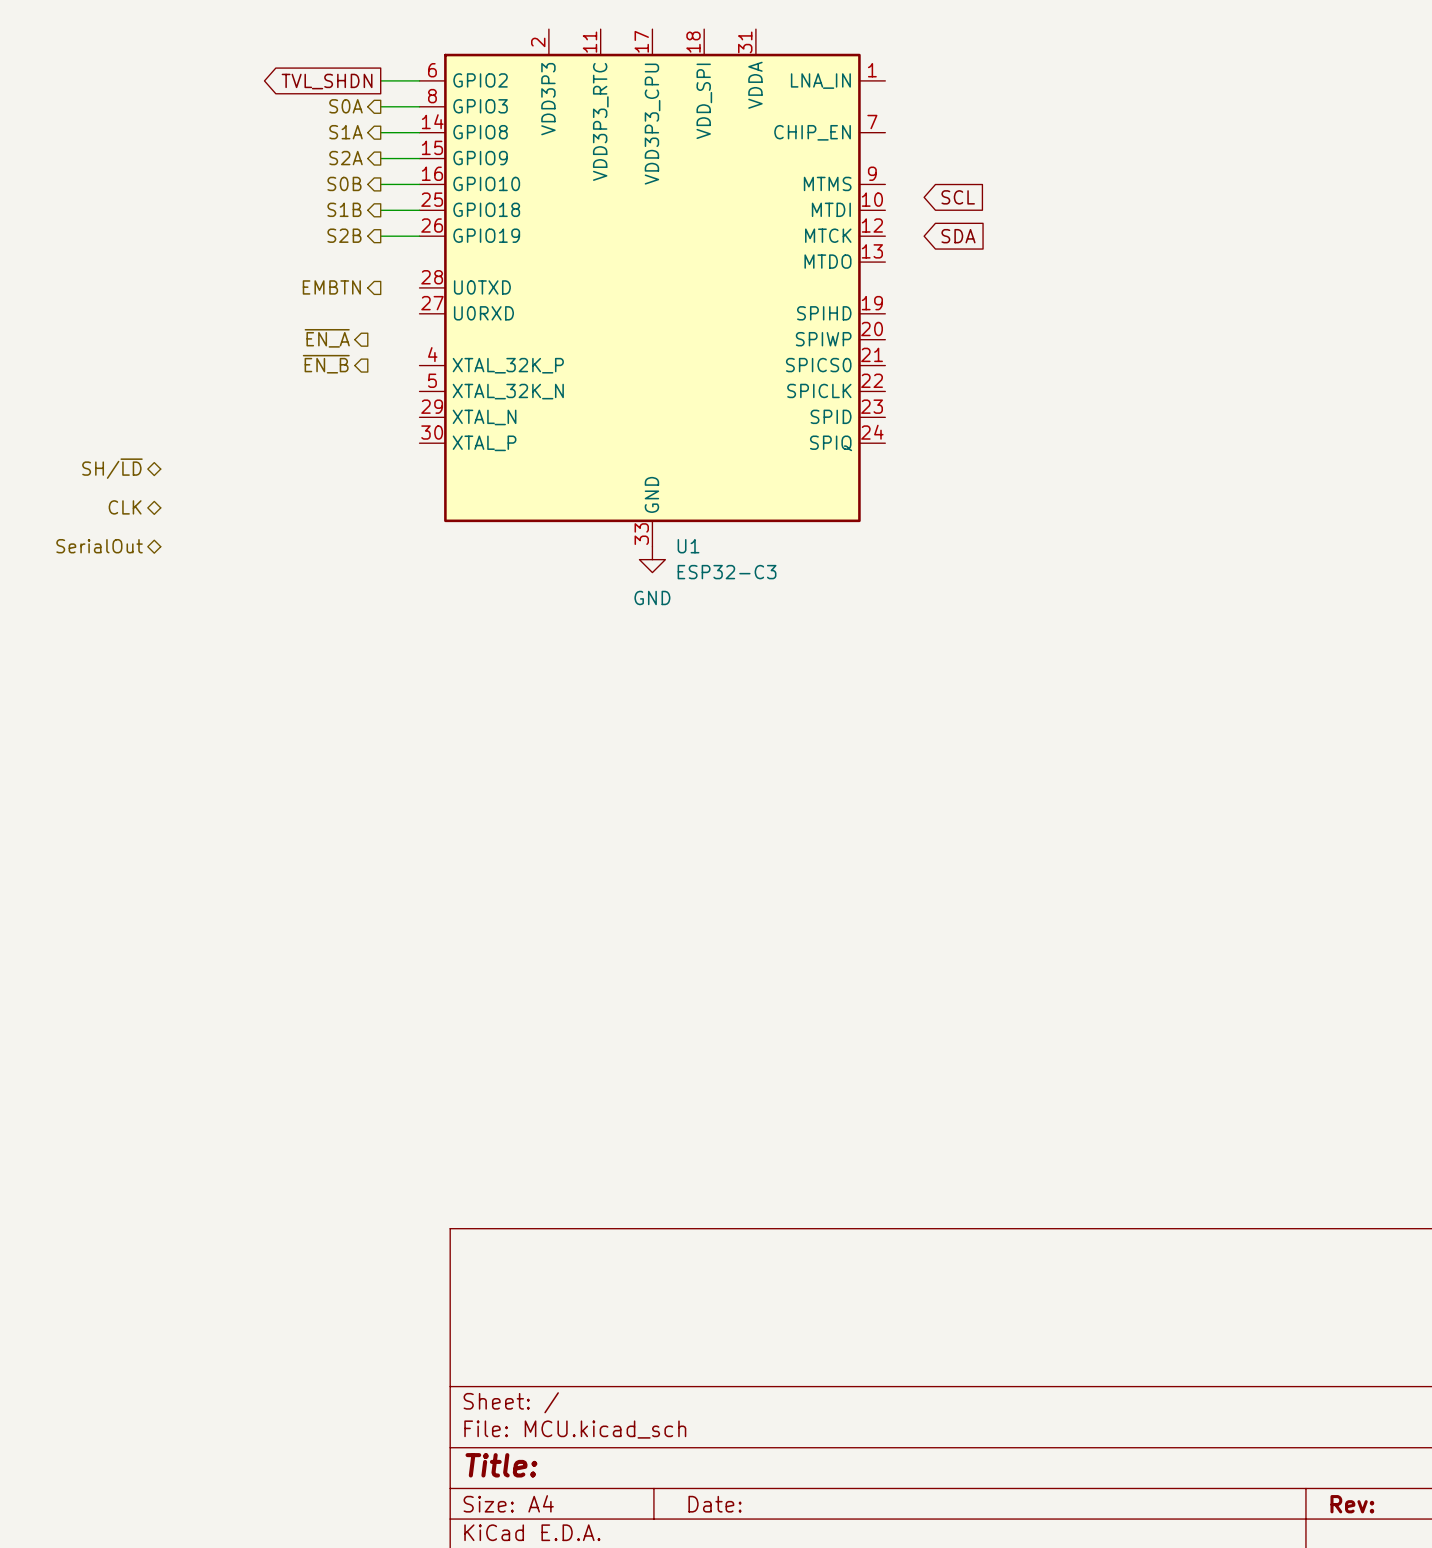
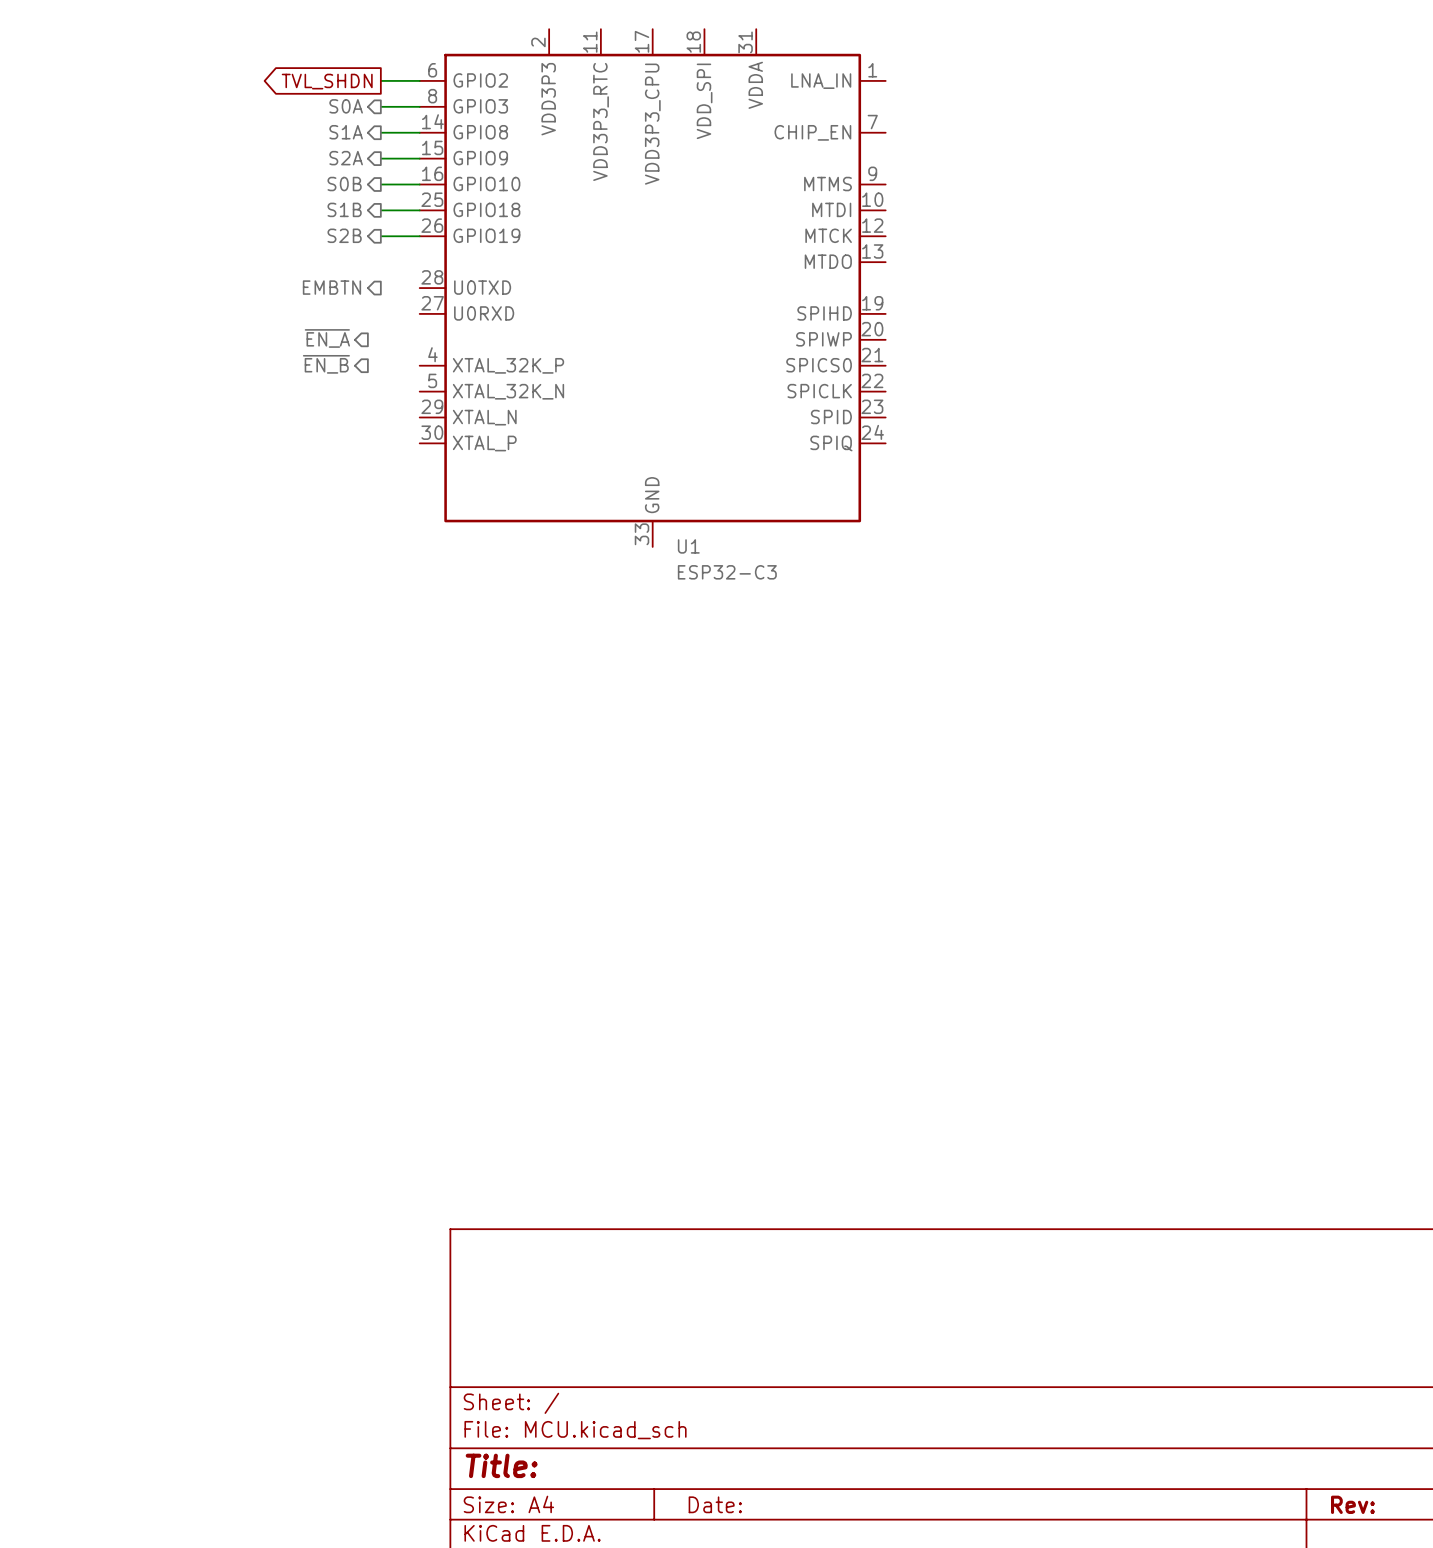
global label: SCL (958, 197) -> none
global label: SDA (958, 236) -> none
hierarchical label: SH/~{LD} (112, 468) -> none
hierarchical label: CLK (125, 507) -> none
hierarchical label: SerialOut (99, 546) -> none
power symbol: GND (652, 559) -> none

